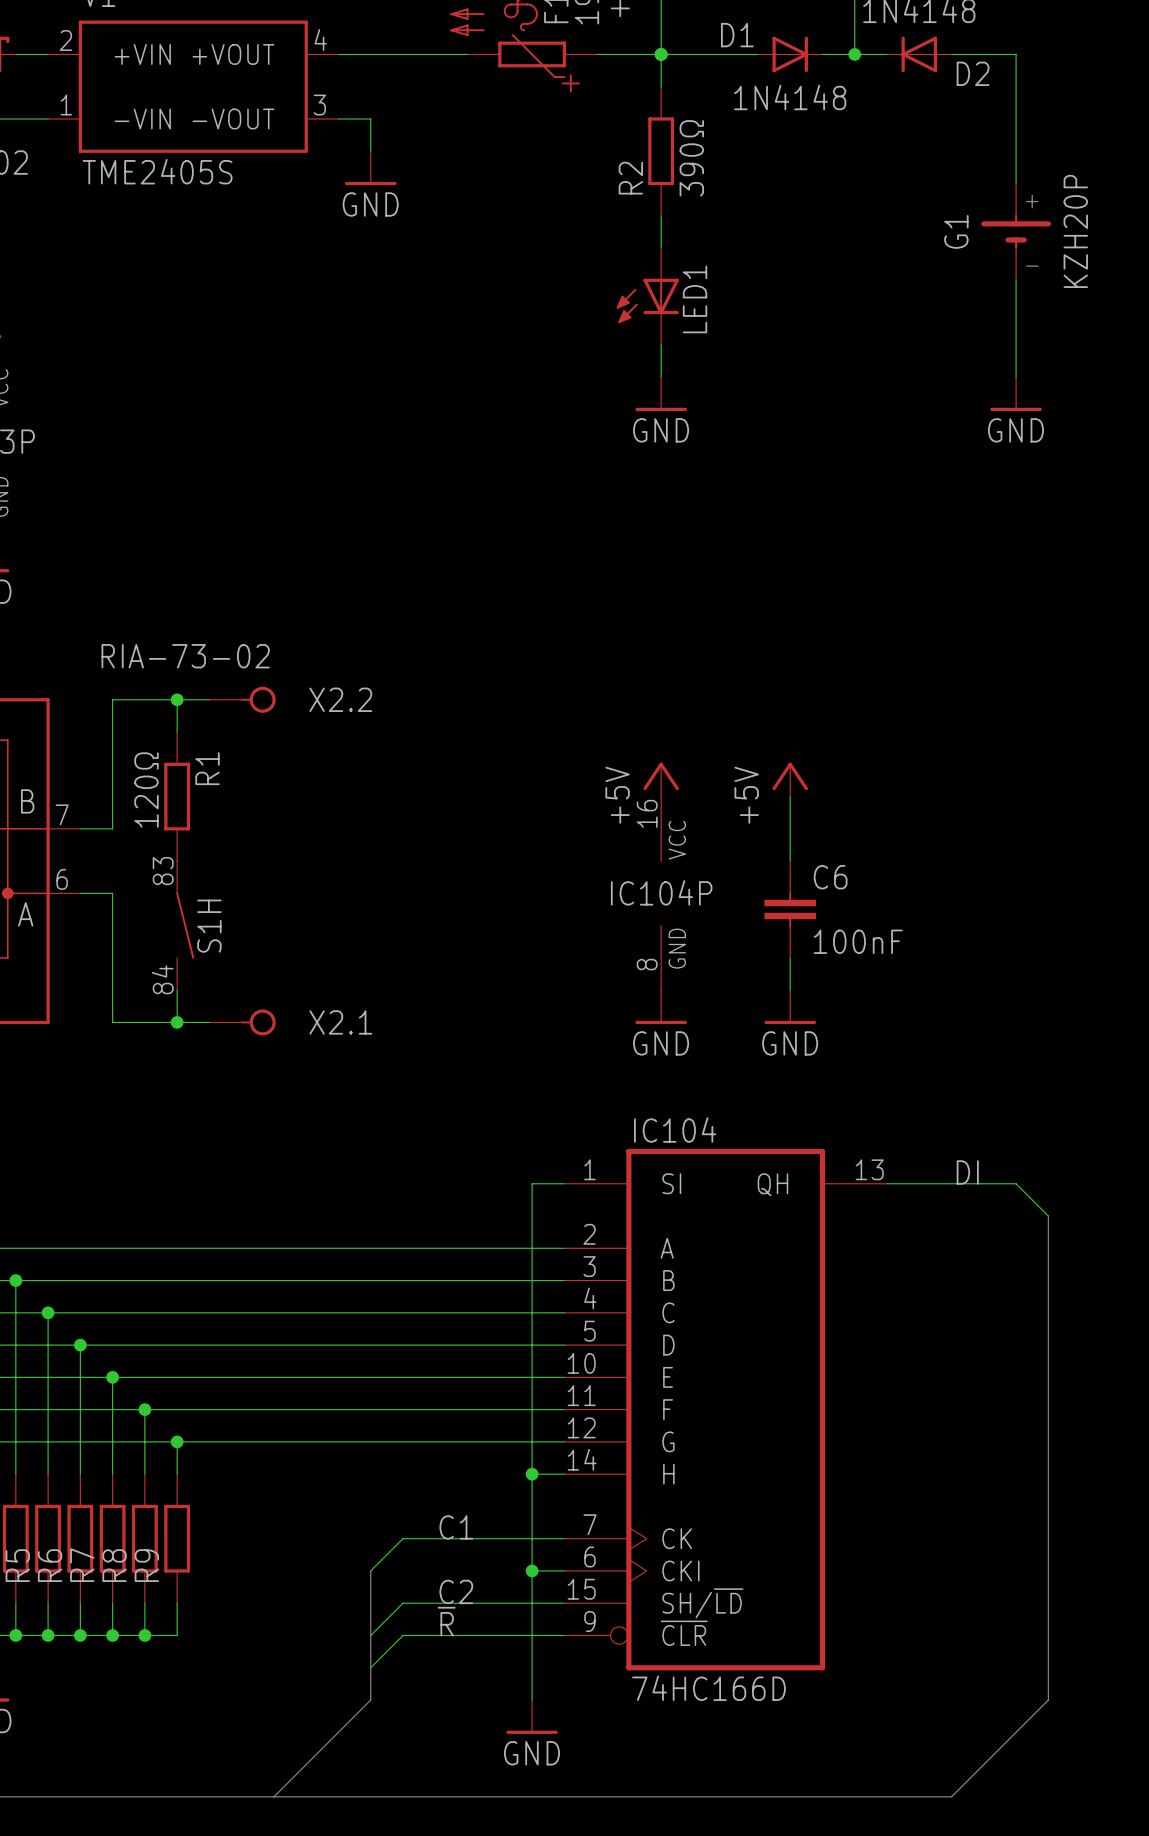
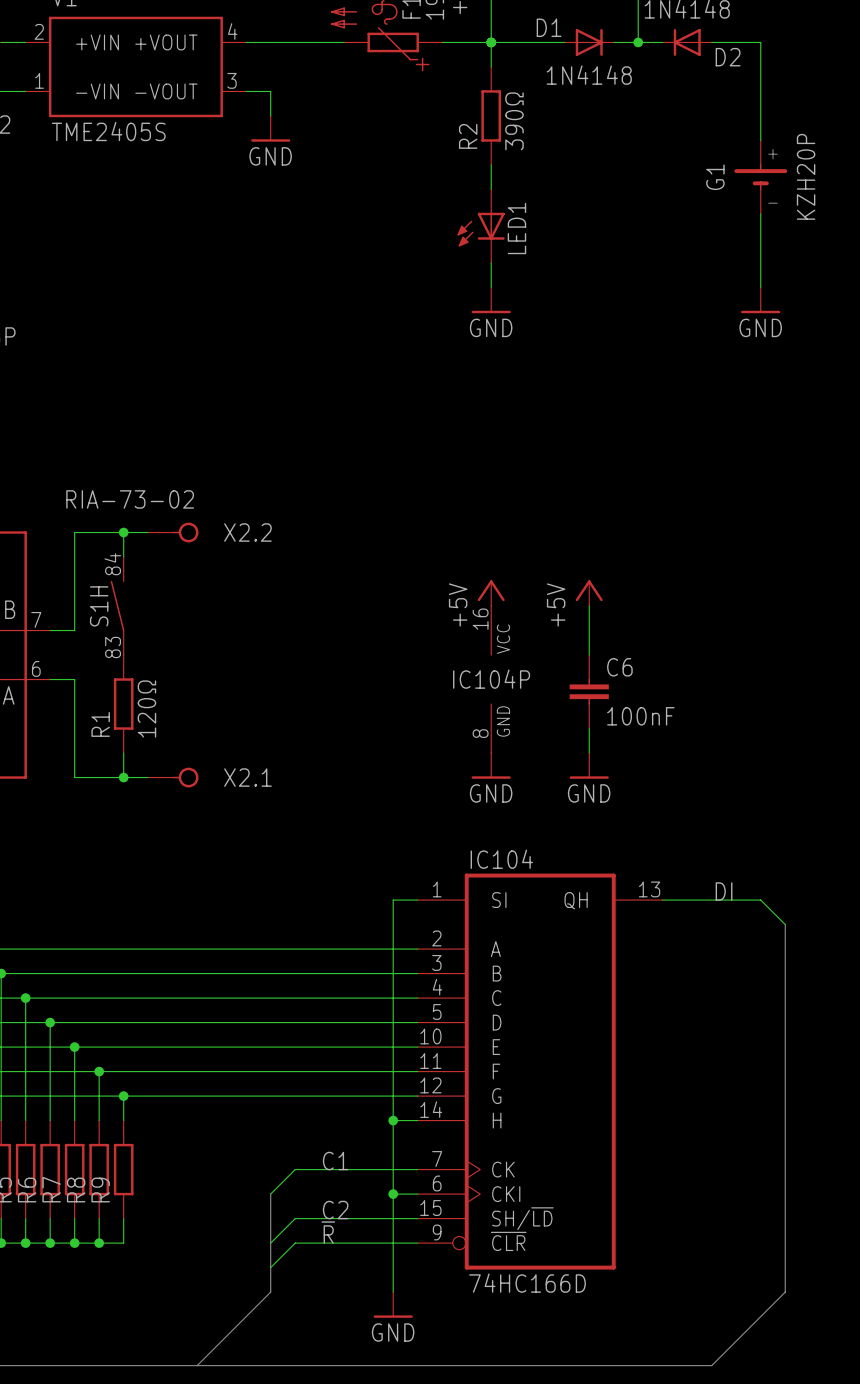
R1 name position: R1 (207, 768) -> R1 (100, 724)
R1 value position: 120Ω (146, 790) -> 120Ω (146, 709)
R1 position: (177, 796) -> (123, 704)
S1H rotation: 0° (185, 925) -> 180° (117, 606)
S1H position: (185, 925) -> (117, 606)

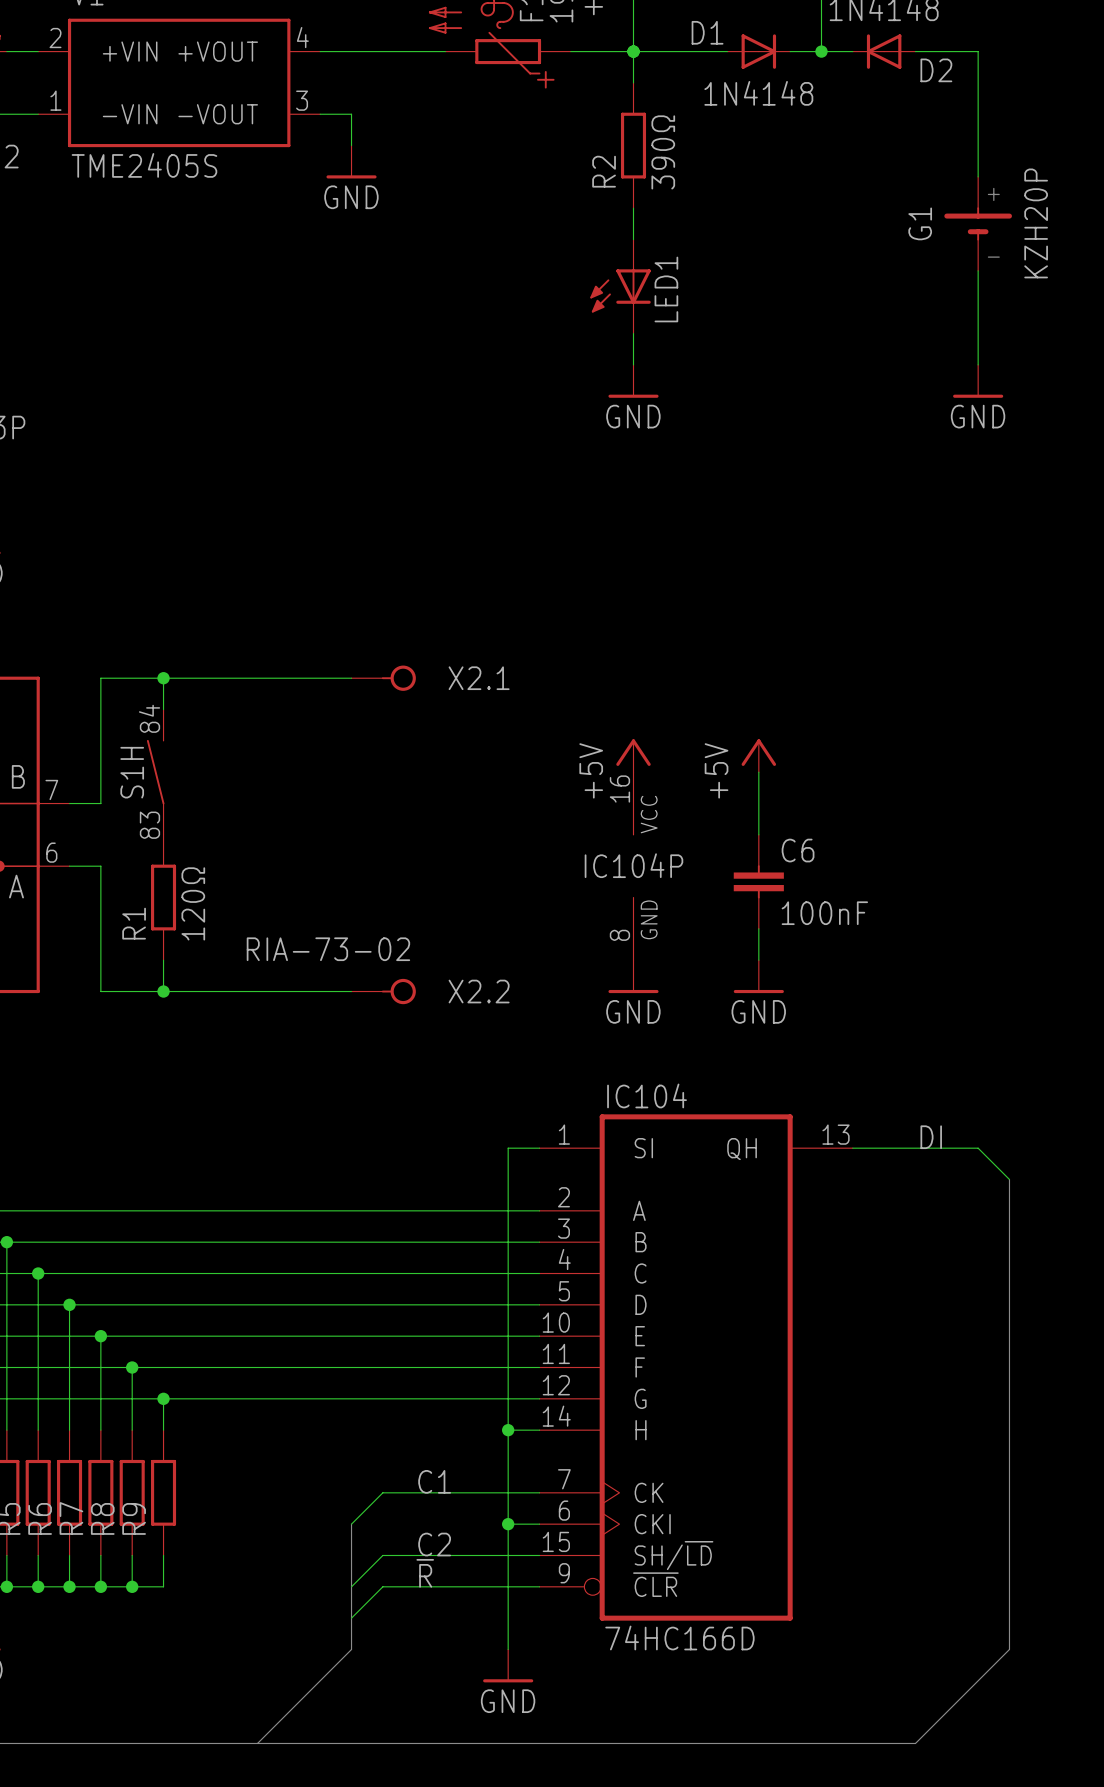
wire: none -> (194, 678) (351, 678)
X2.2 position: (173, 532) -> (383, 991)
wire: none -> (194, 991) (351, 991)
X2.1 position: (173, 777) -> (383, 678)

